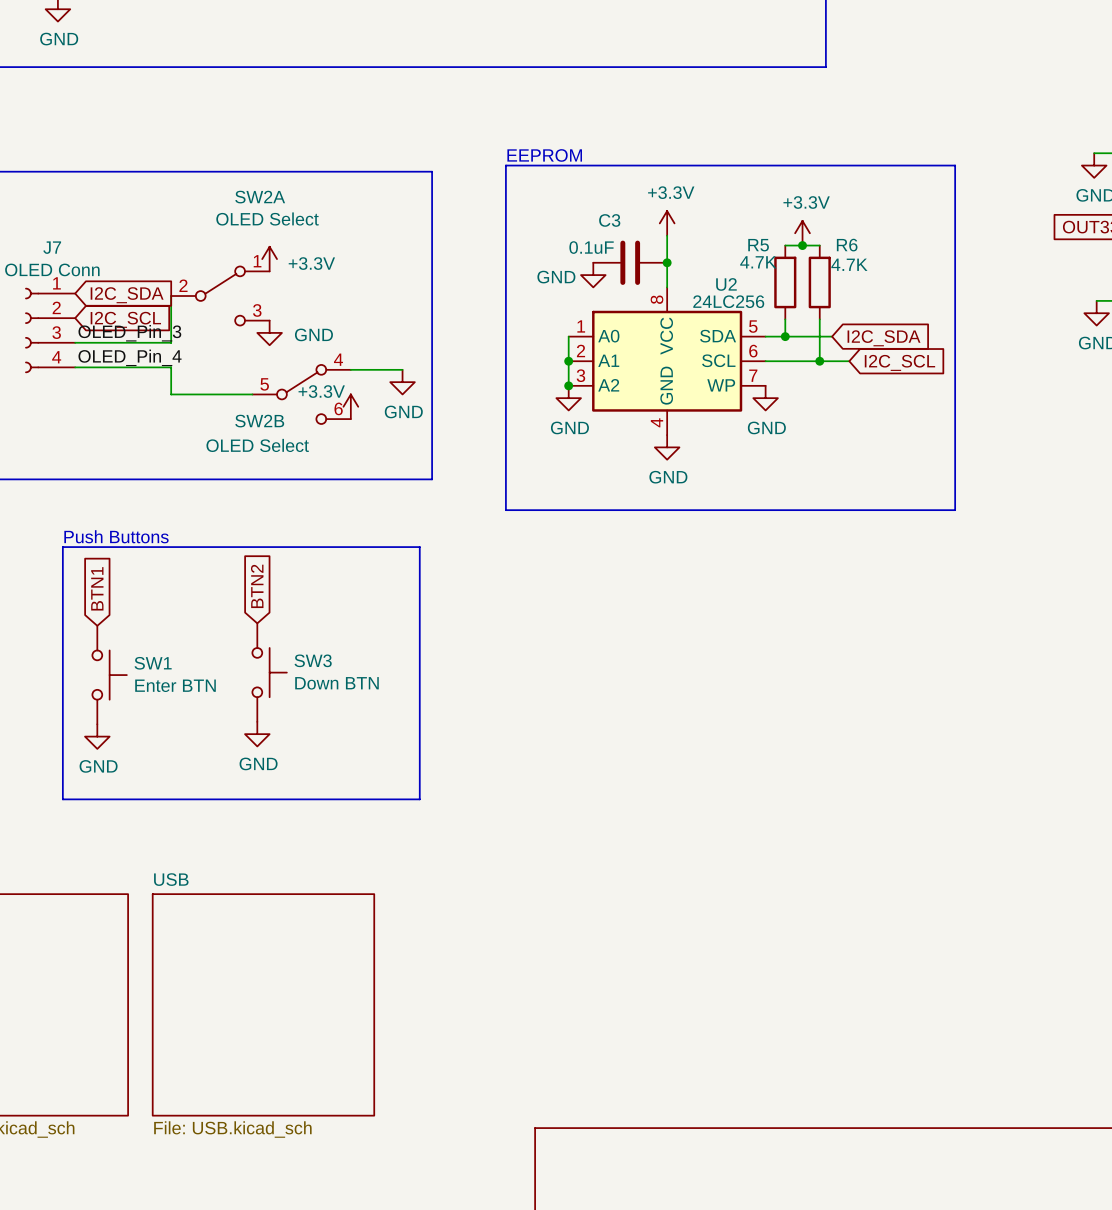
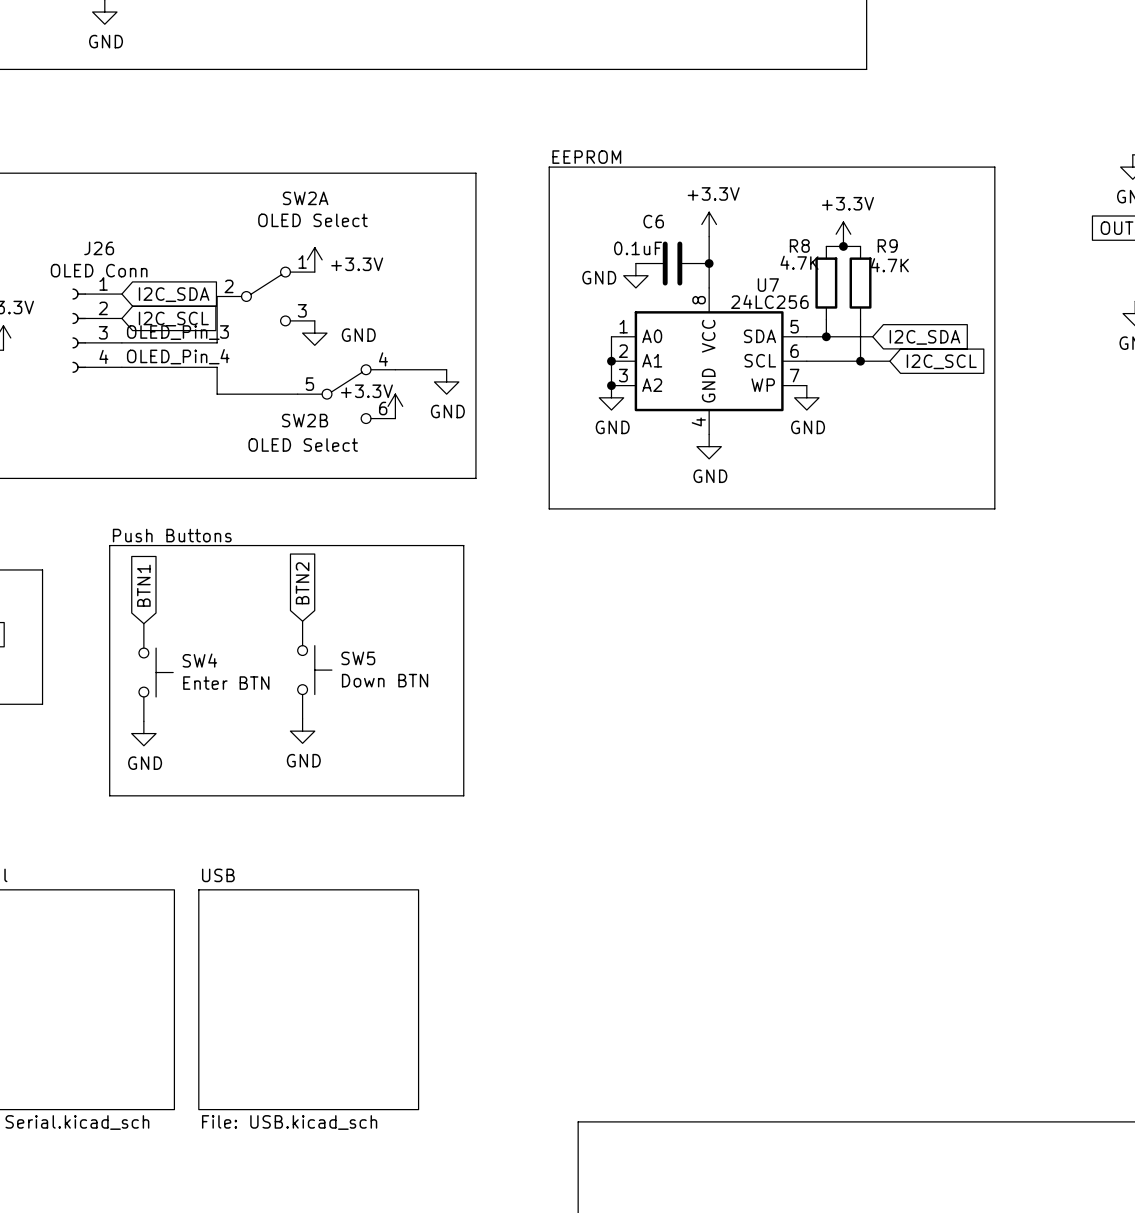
C3 name: C3 (609, 220) -> C6 (653, 221)
R5 name: R5 (758, 245) -> R8 (799, 245)
R6 name: R6 (847, 245) -> R9 (887, 245)
J7 name: J7 (52, 247) -> J26 (99, 248)
U2 name: U2 (726, 284) -> U7 (768, 285)
SW3 name: SW3 (313, 660) -> SW5 (358, 658)
SW1 name: SW1 (153, 663) -> SW4 (199, 660)

